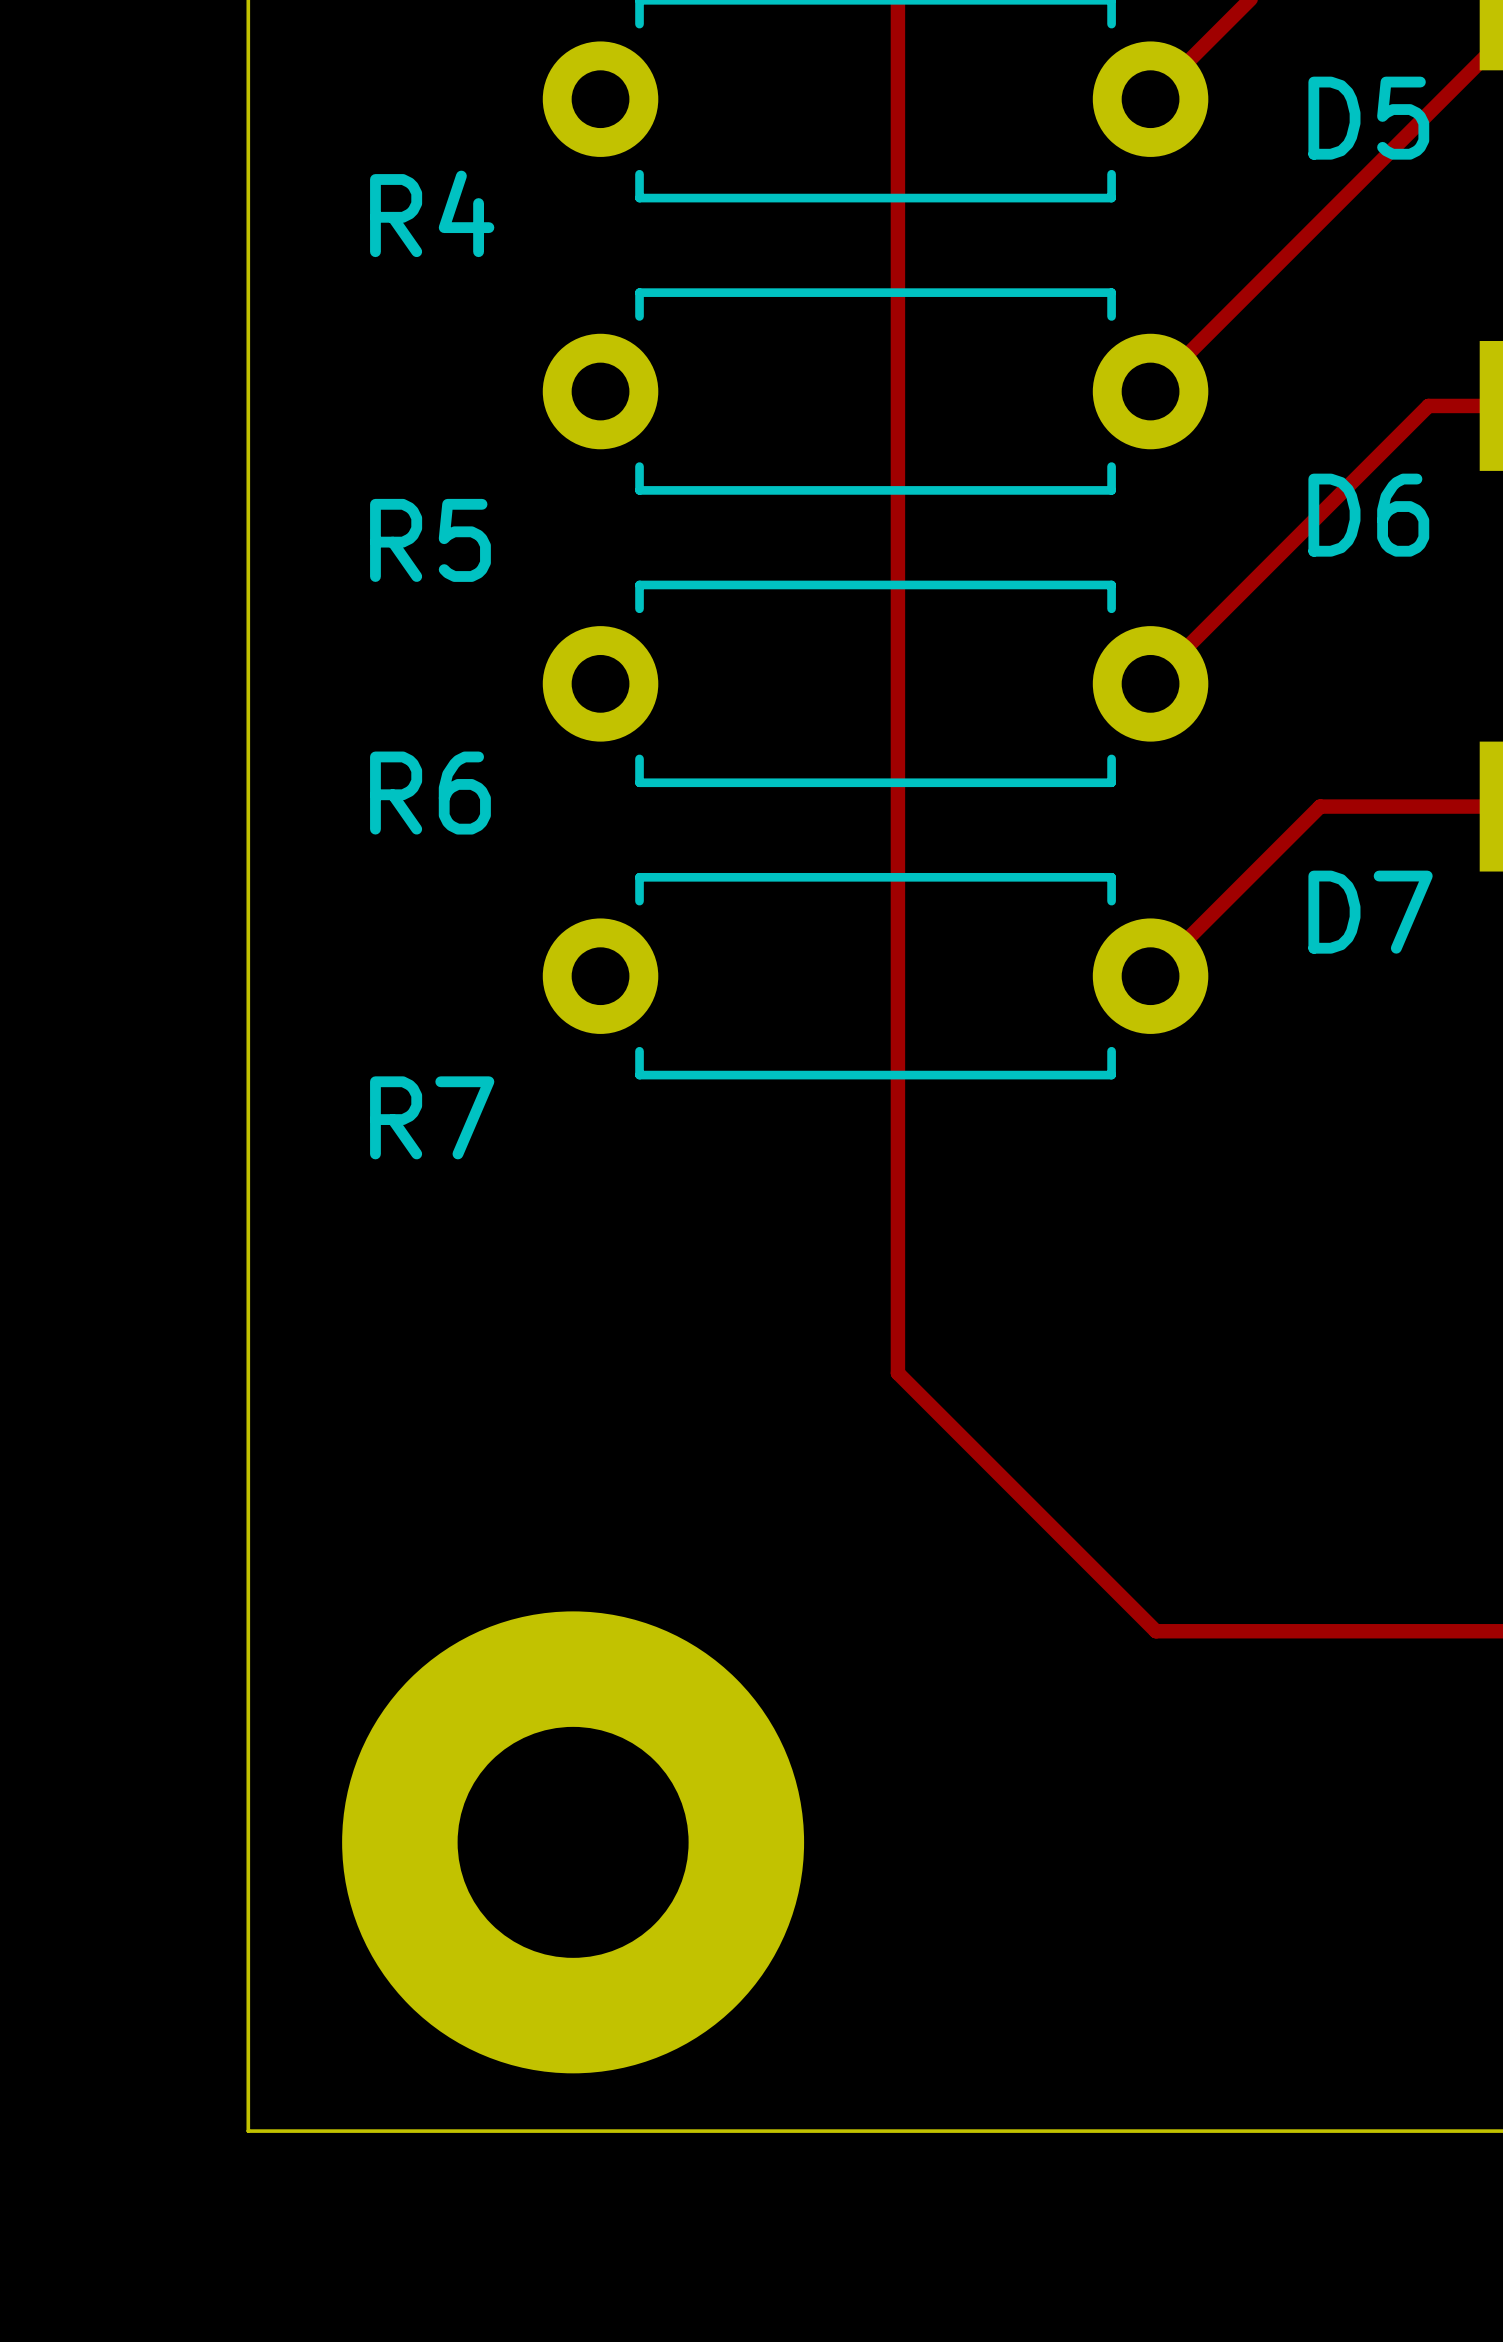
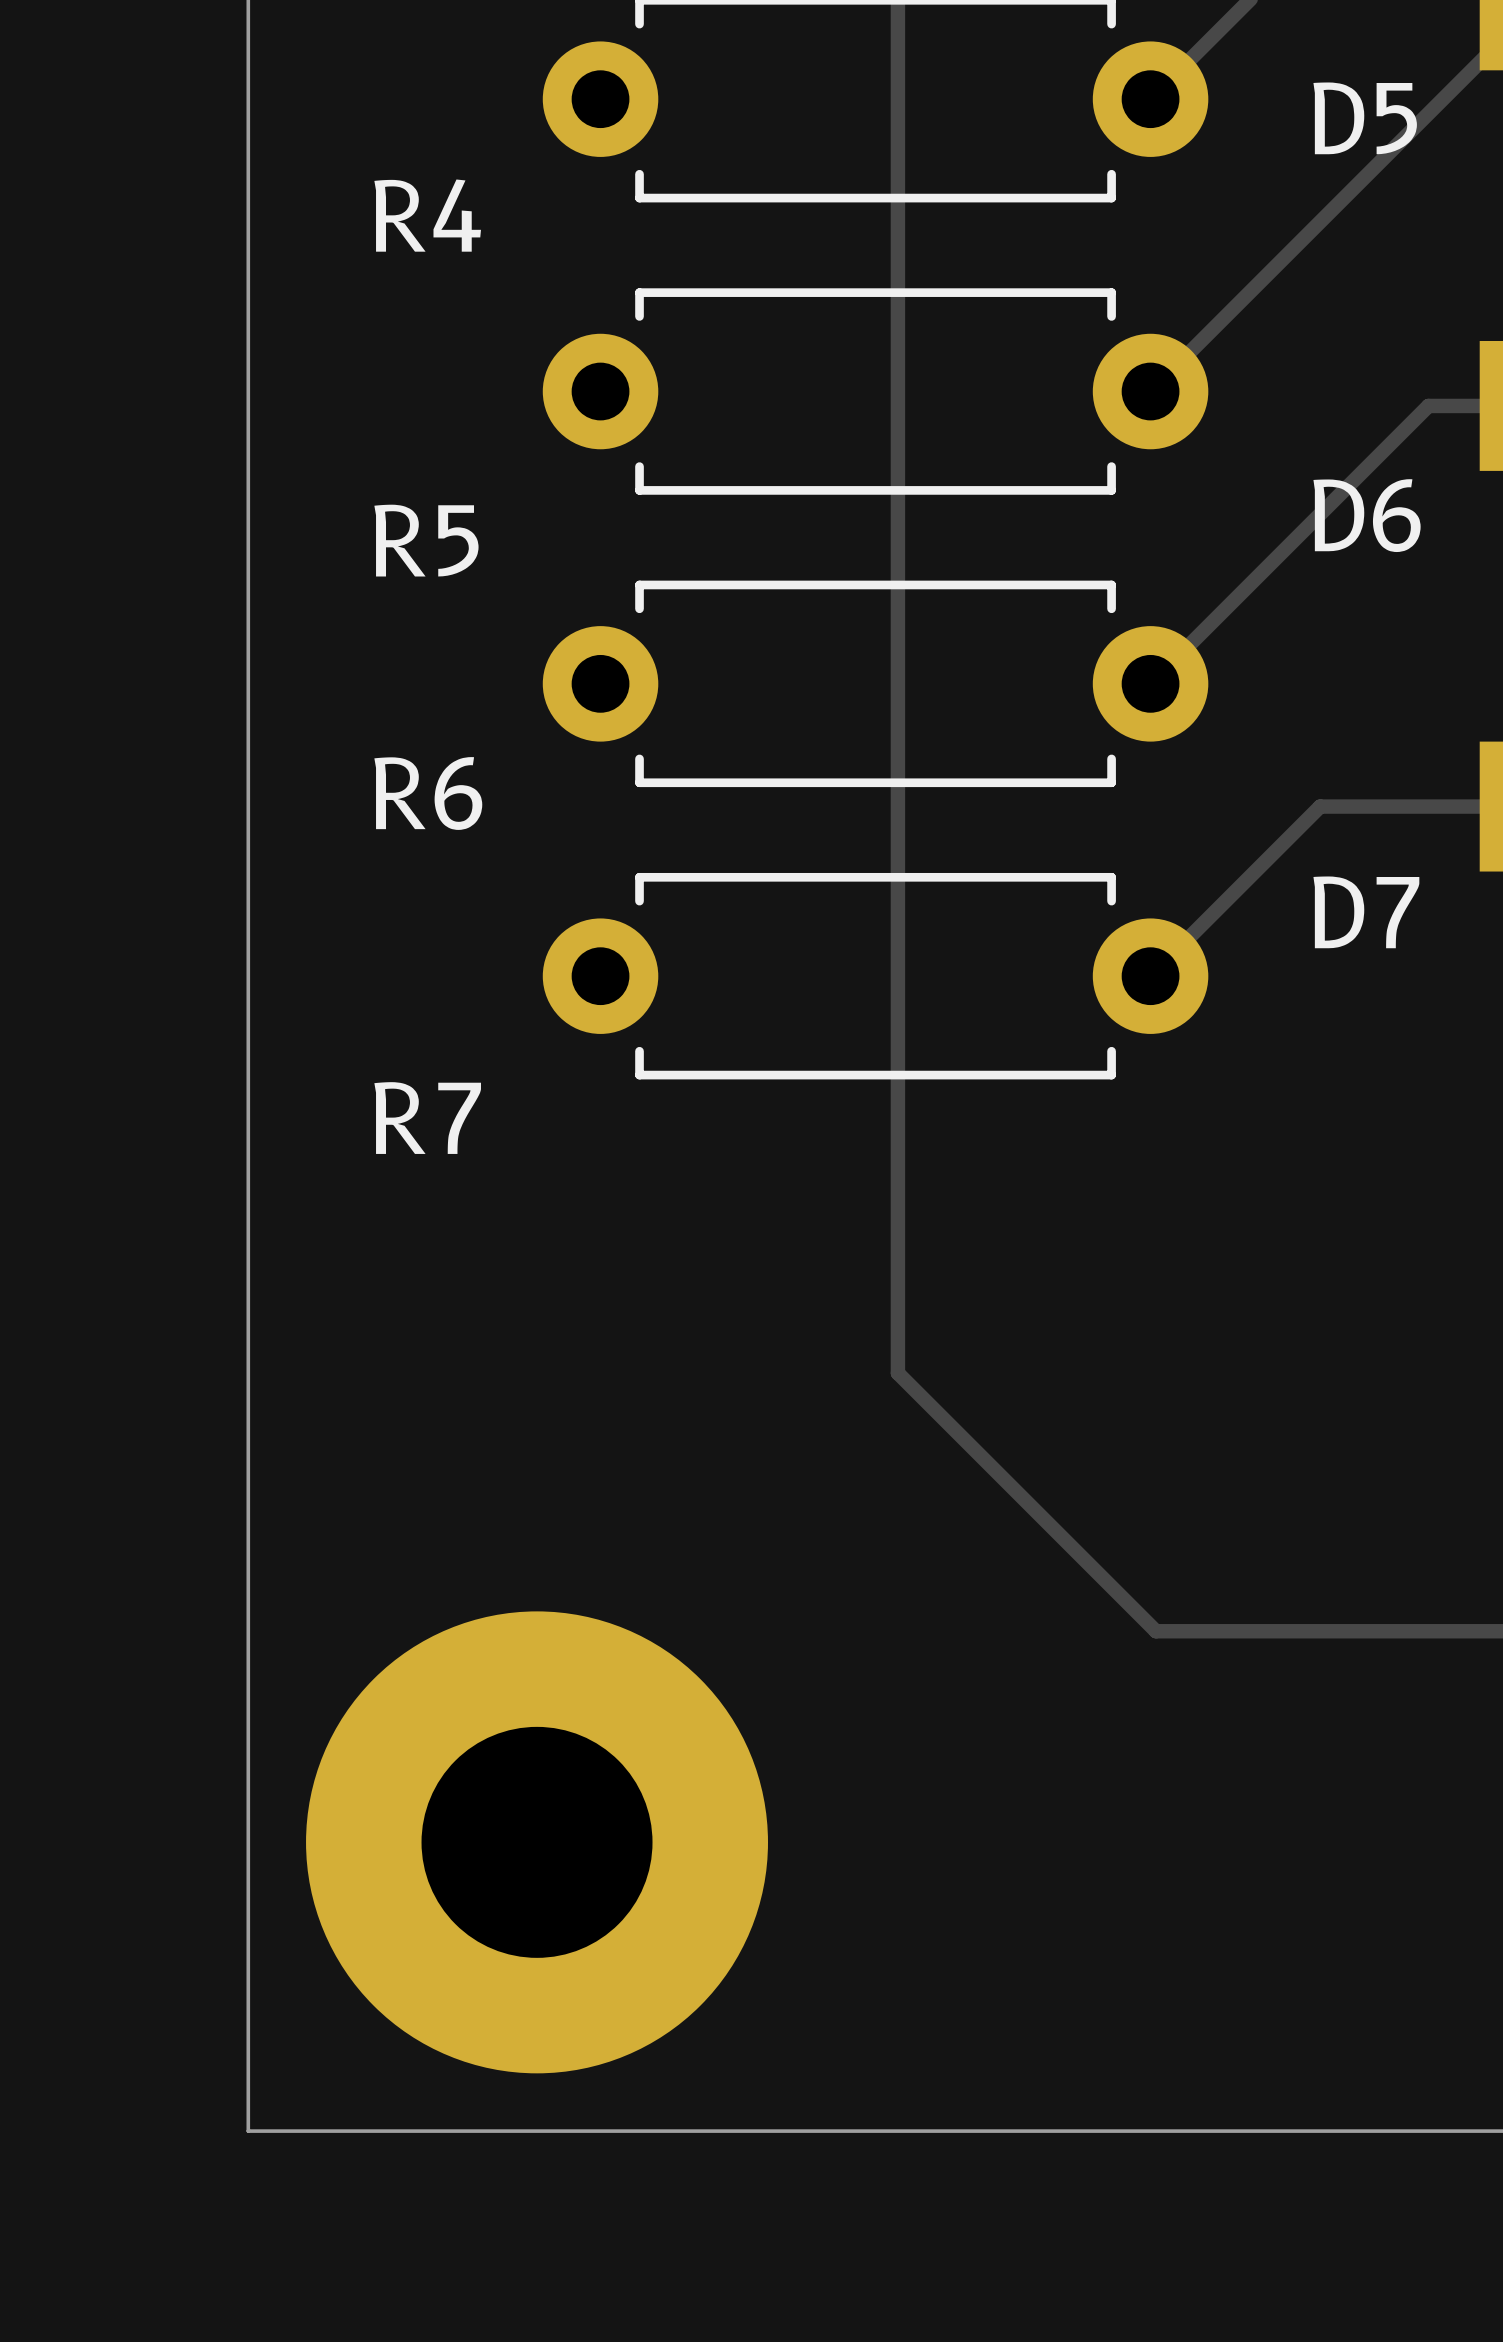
part position: (573, 1842) -> (537, 1842)

